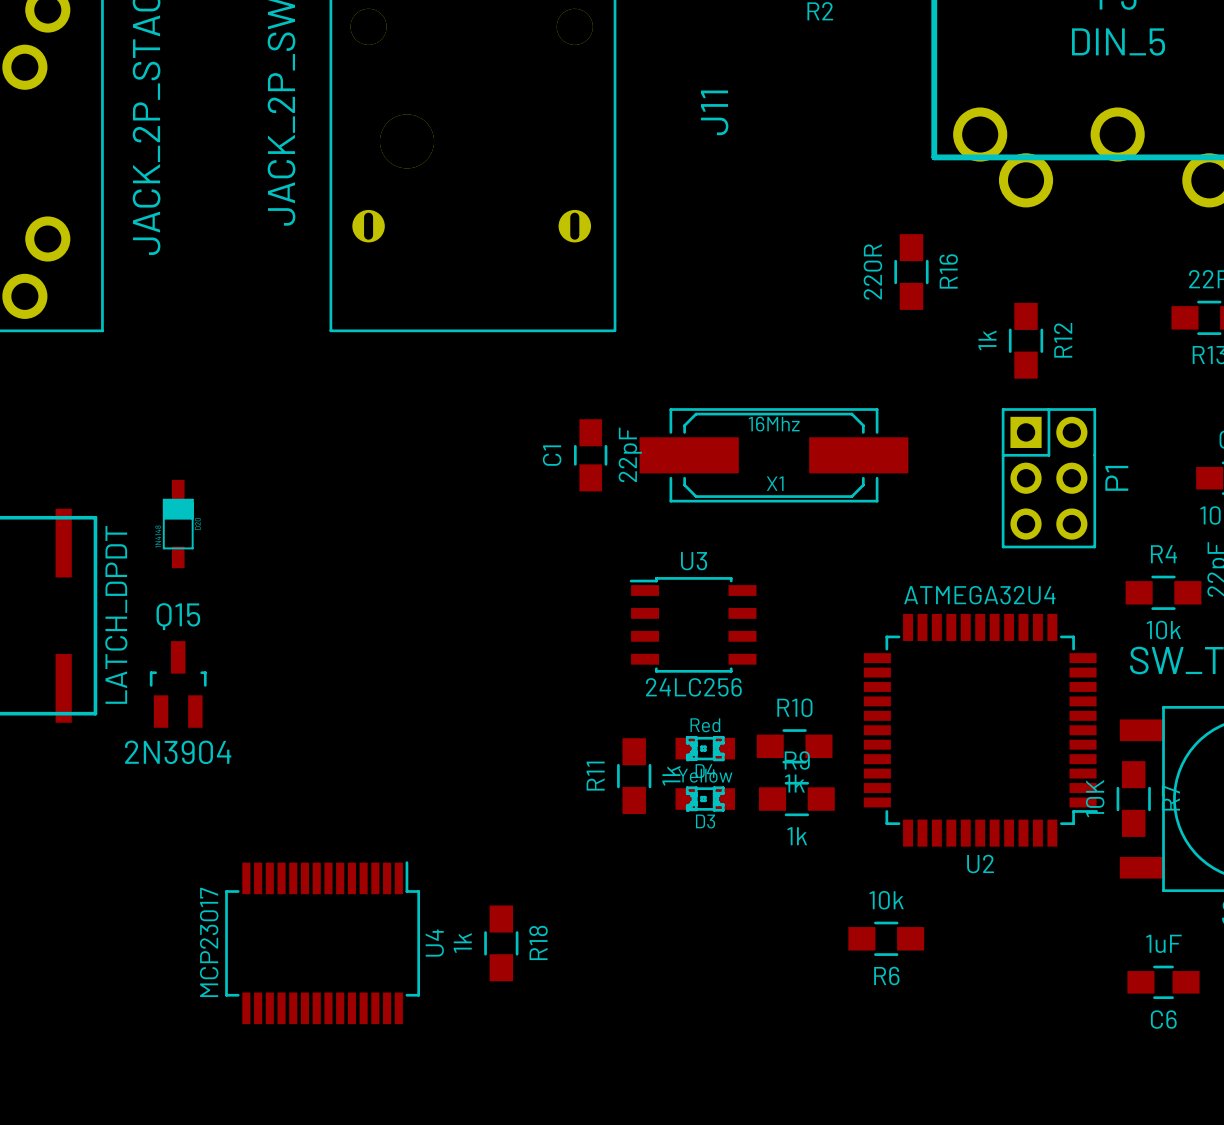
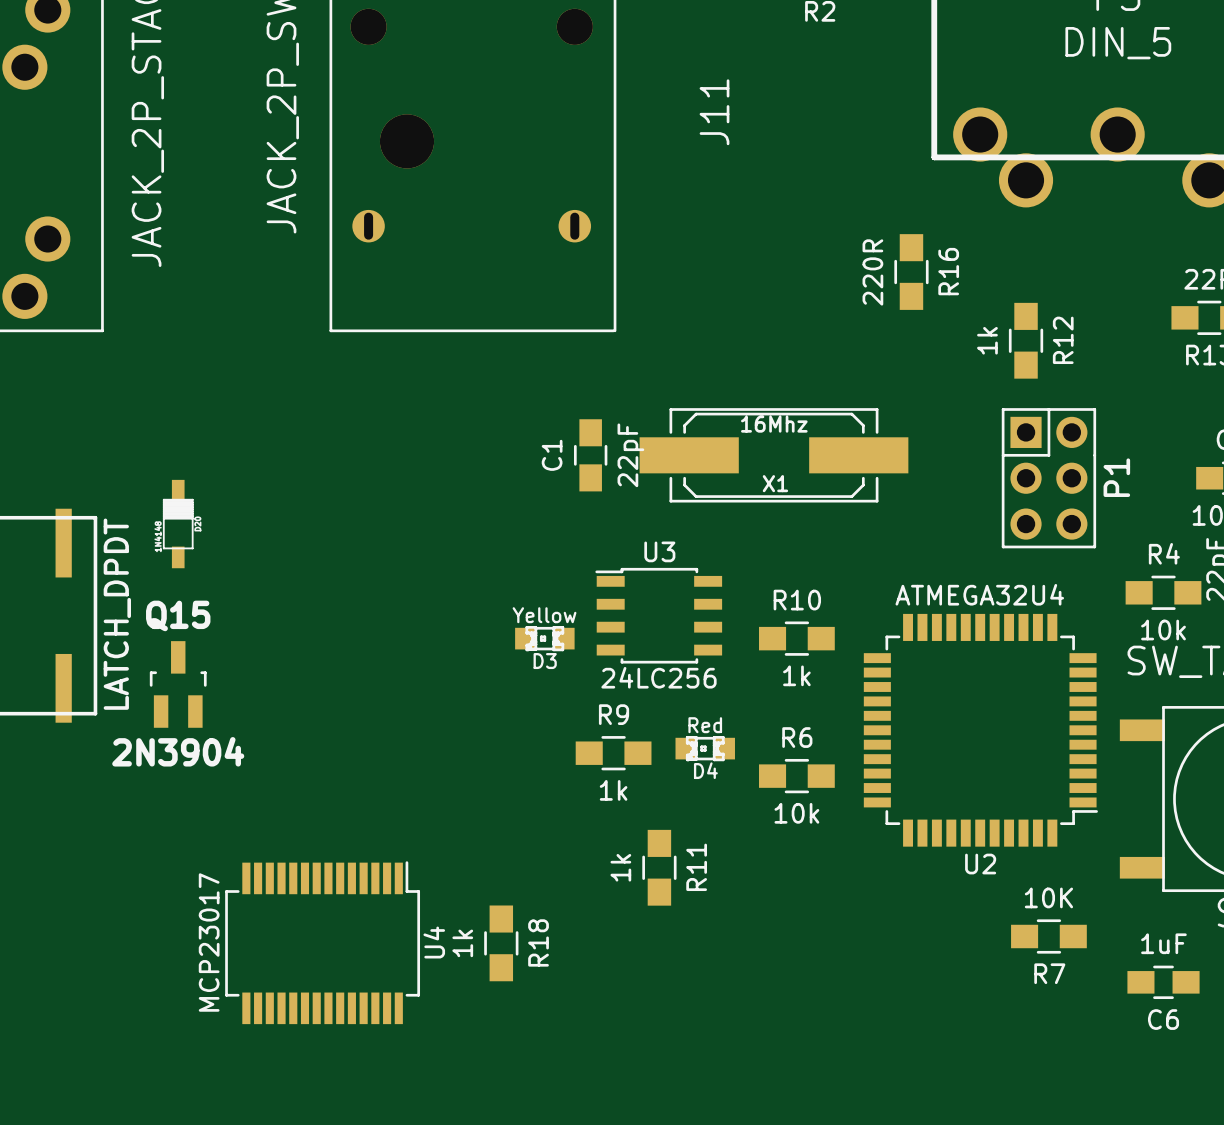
U3 position: (693, 624) -> (658, 615)
R10 position: (794, 746) -> (796, 638)
R11 value position: 1k (671, 775) -> 1k (620, 867)
R11 name position: R11 (595, 776) -> R11 (696, 867)
R11 position: (634, 776) -> (659, 867)
D3 position: (705, 799) -> (544, 638)
R9 position: (796, 799) -> (613, 753)
R7 rotation: 0° (1133, 799) -> 90° clockwise (1048, 936)
R7 position: (1133, 799) -> (1048, 936)
R6 value position: 10k (886, 900) -> 10k (796, 813)
R6 position: (886, 938) -> (796, 776)
R6 name position: R6 (886, 975) -> R6 (797, 737)

